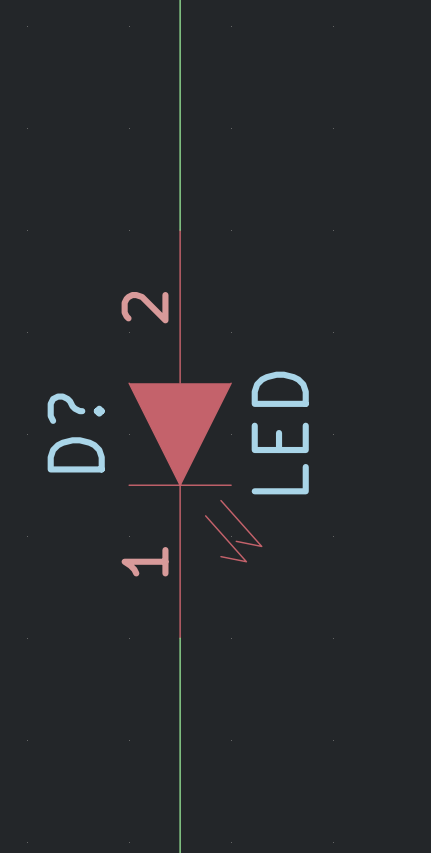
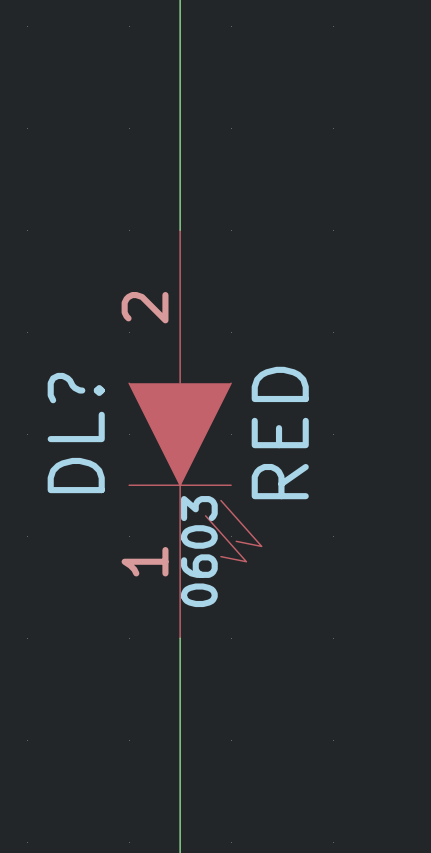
D? name: D? (76, 433) -> DL? (76, 433)
D? value: LED (280, 433) -> RED (280, 433)
D? text: none -> 0603 (199, 551)

